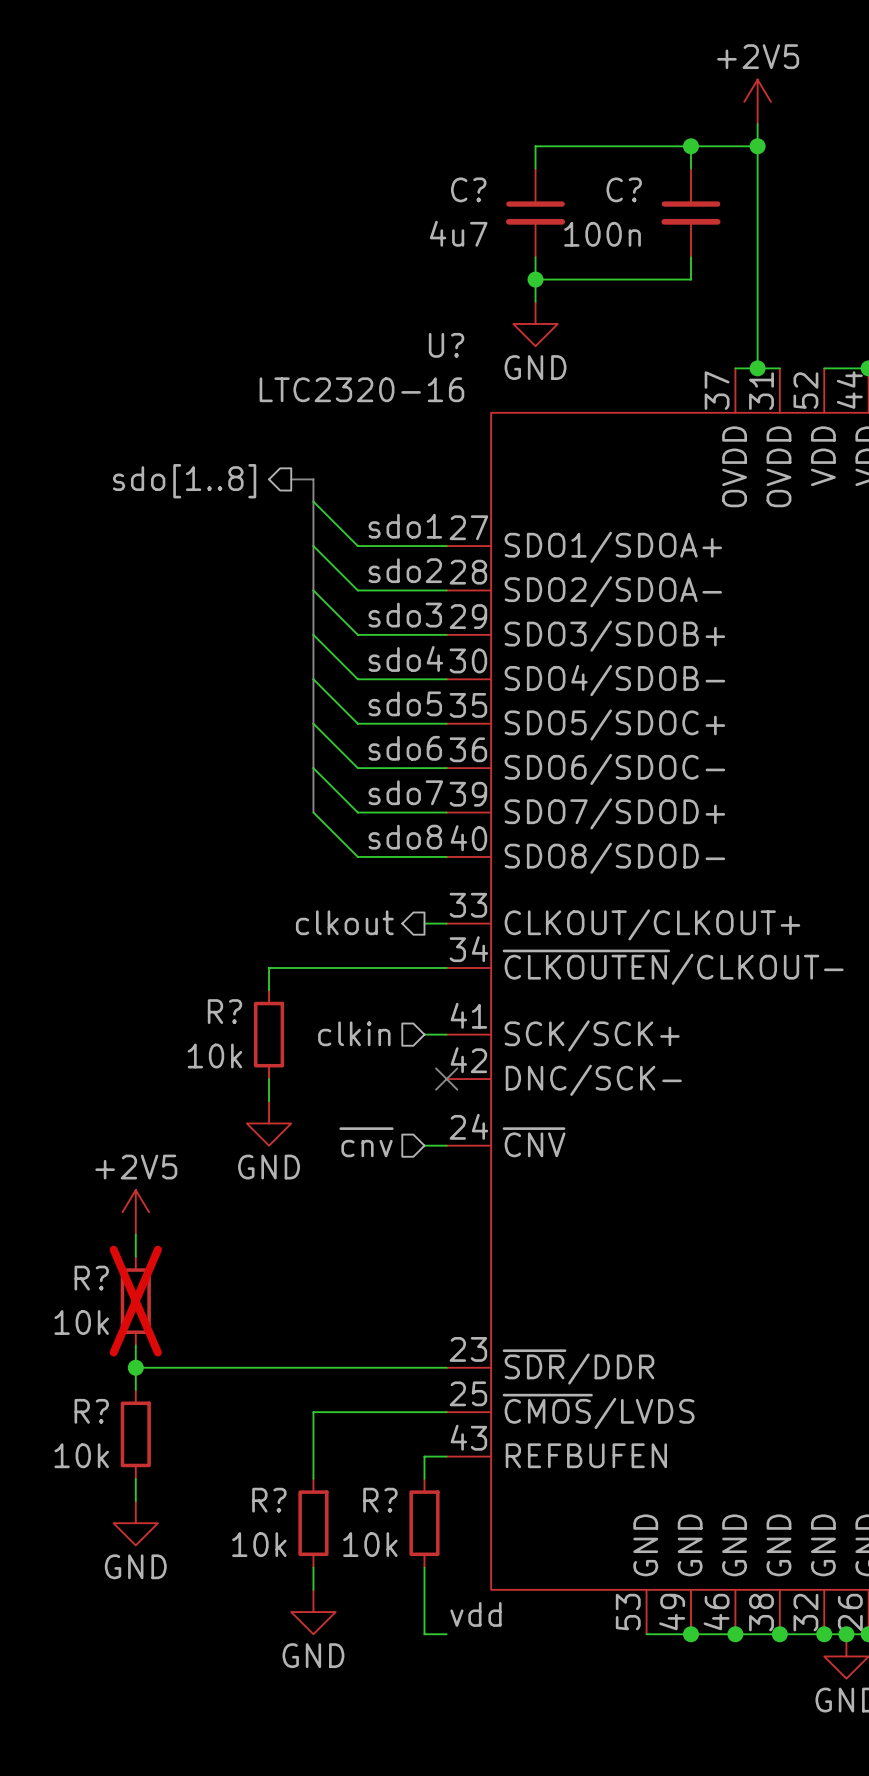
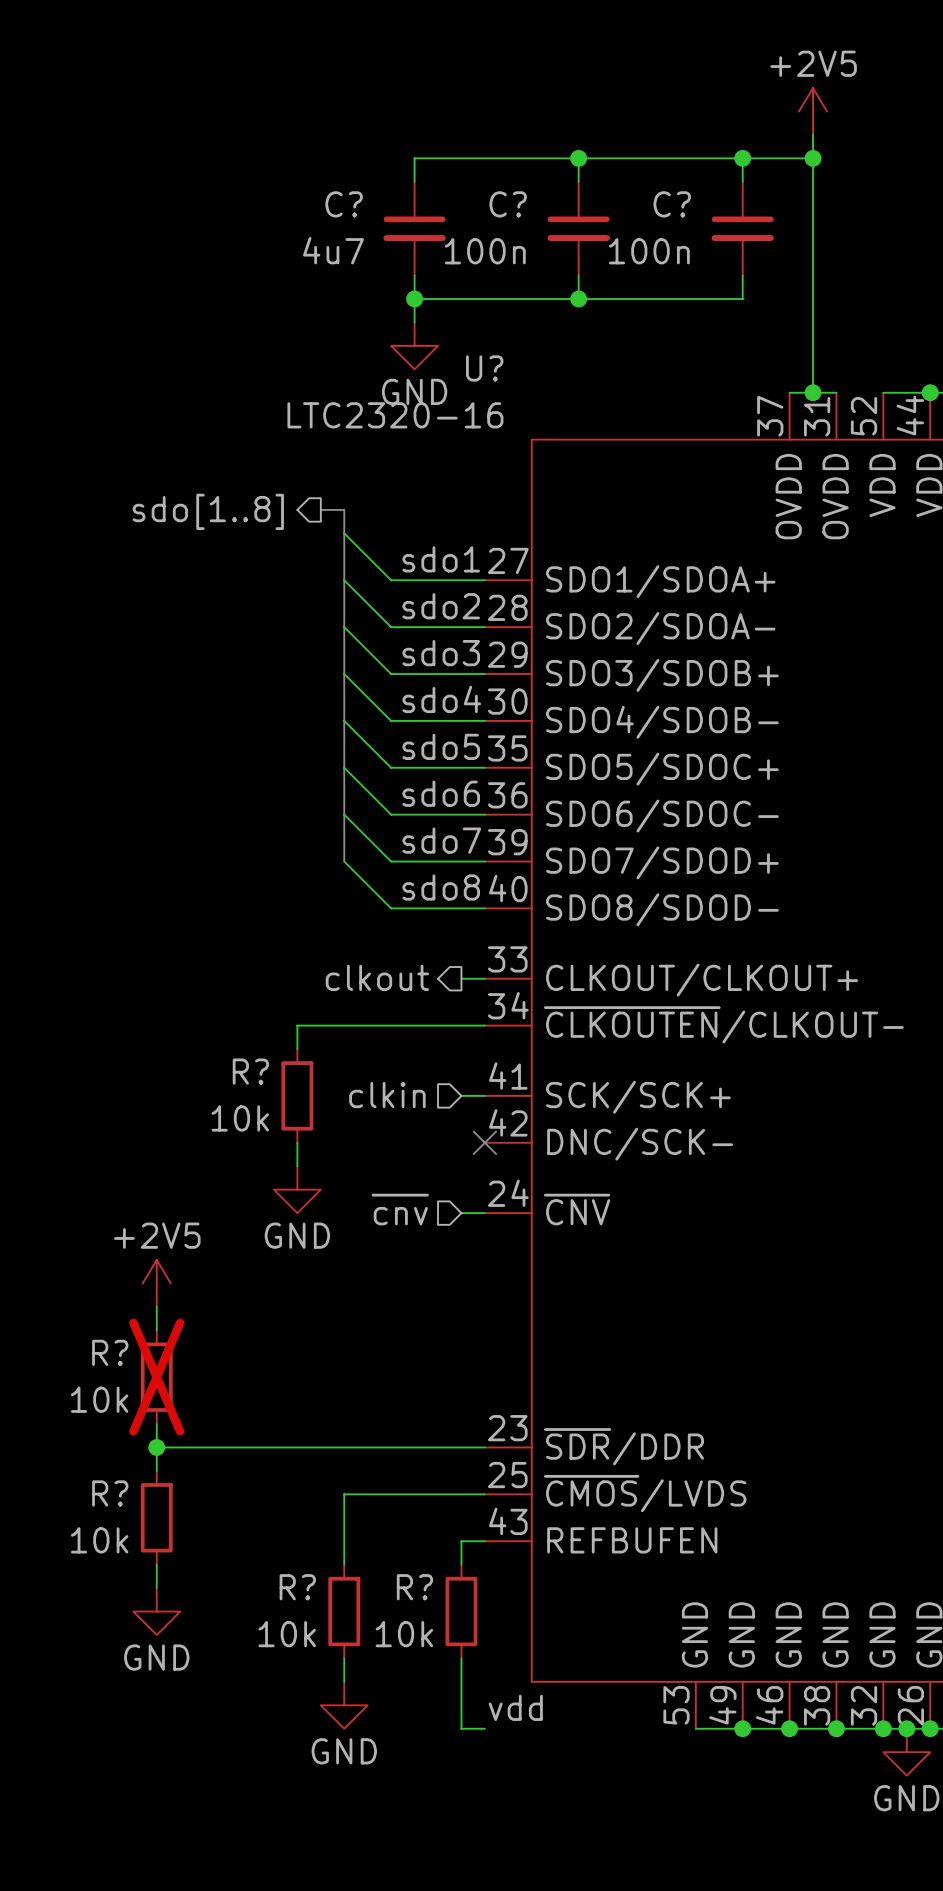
wire: none -> (578, 158) (414, 158) (414, 181)
junction: none -> (578, 158)
C?: none -> 4u7 (414, 228)
C? value: 4u7 (458, 233) -> 100n (485, 251)
wire: none -> (414, 275) (414, 322)
junction: none -> (414, 299)
wire: (535, 279) (535, 301) -> (578, 299) (414, 299)
power symbol position: GND (535, 323) -> GND (414, 345)

